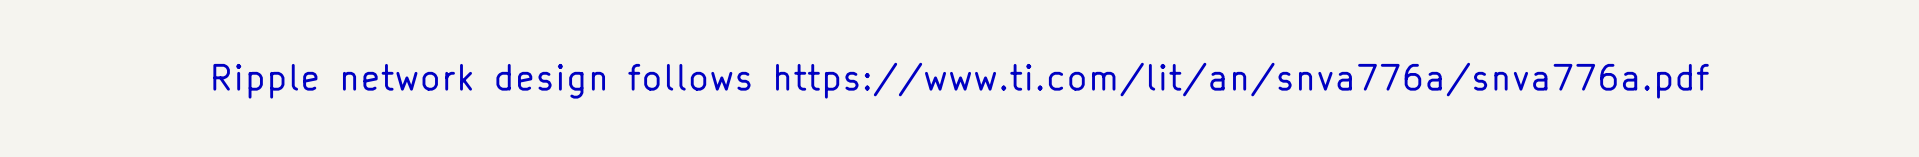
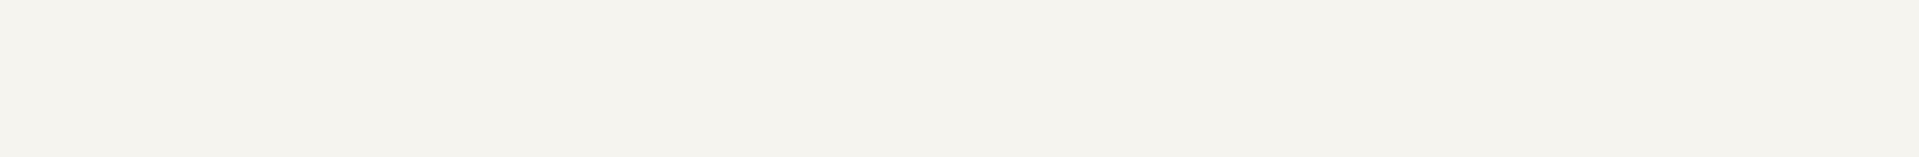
text: Ripple network design follows https://www.ti.com/lit/an/snva776a/snva776a.pdf (961, 80) -> none

